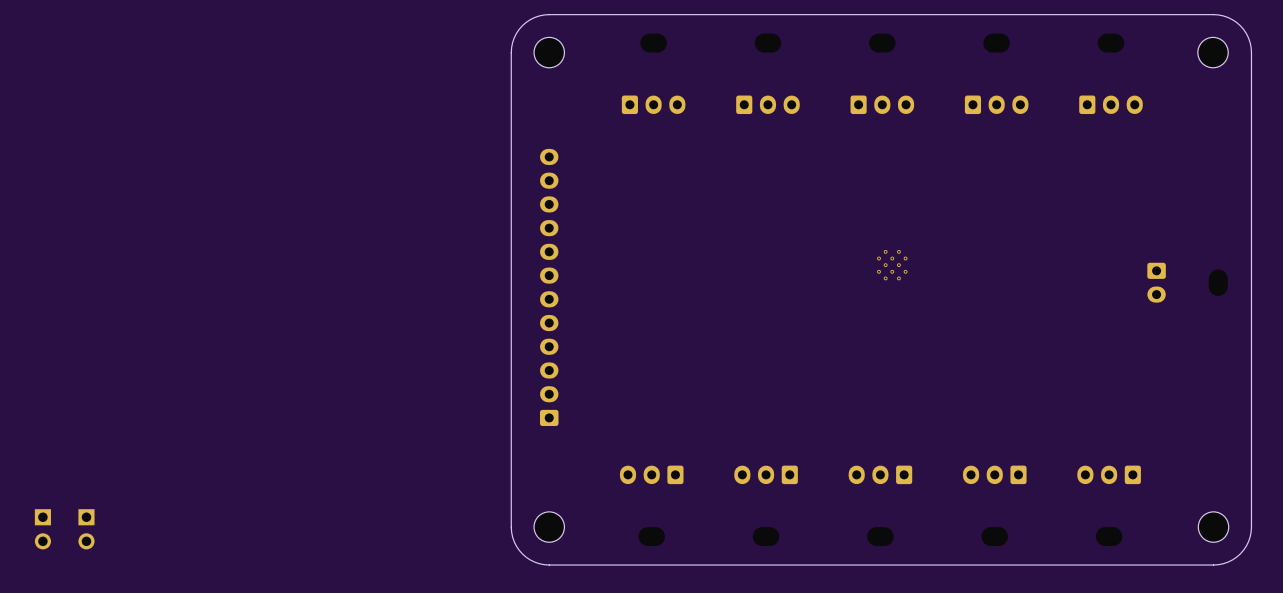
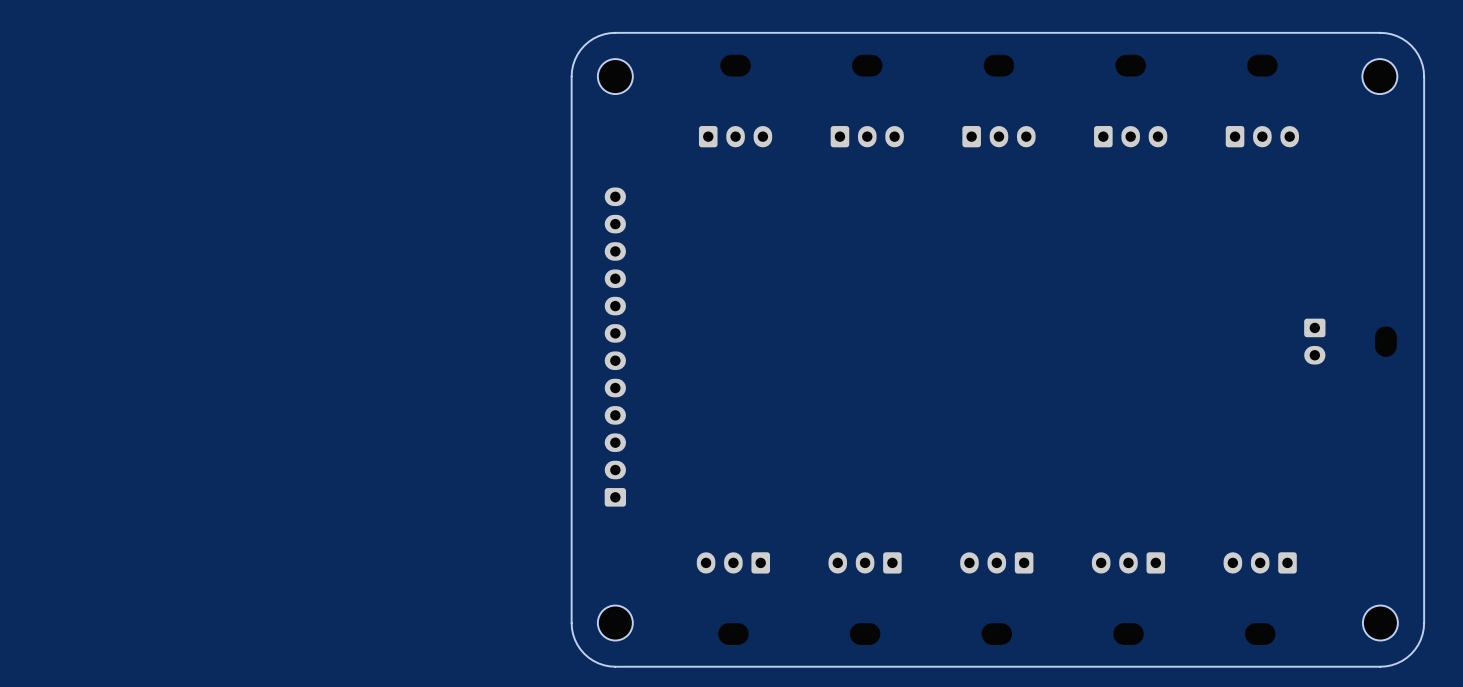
part: (892, 265) -> none
part: (42, 529) -> none
part: (86, 529) -> none

